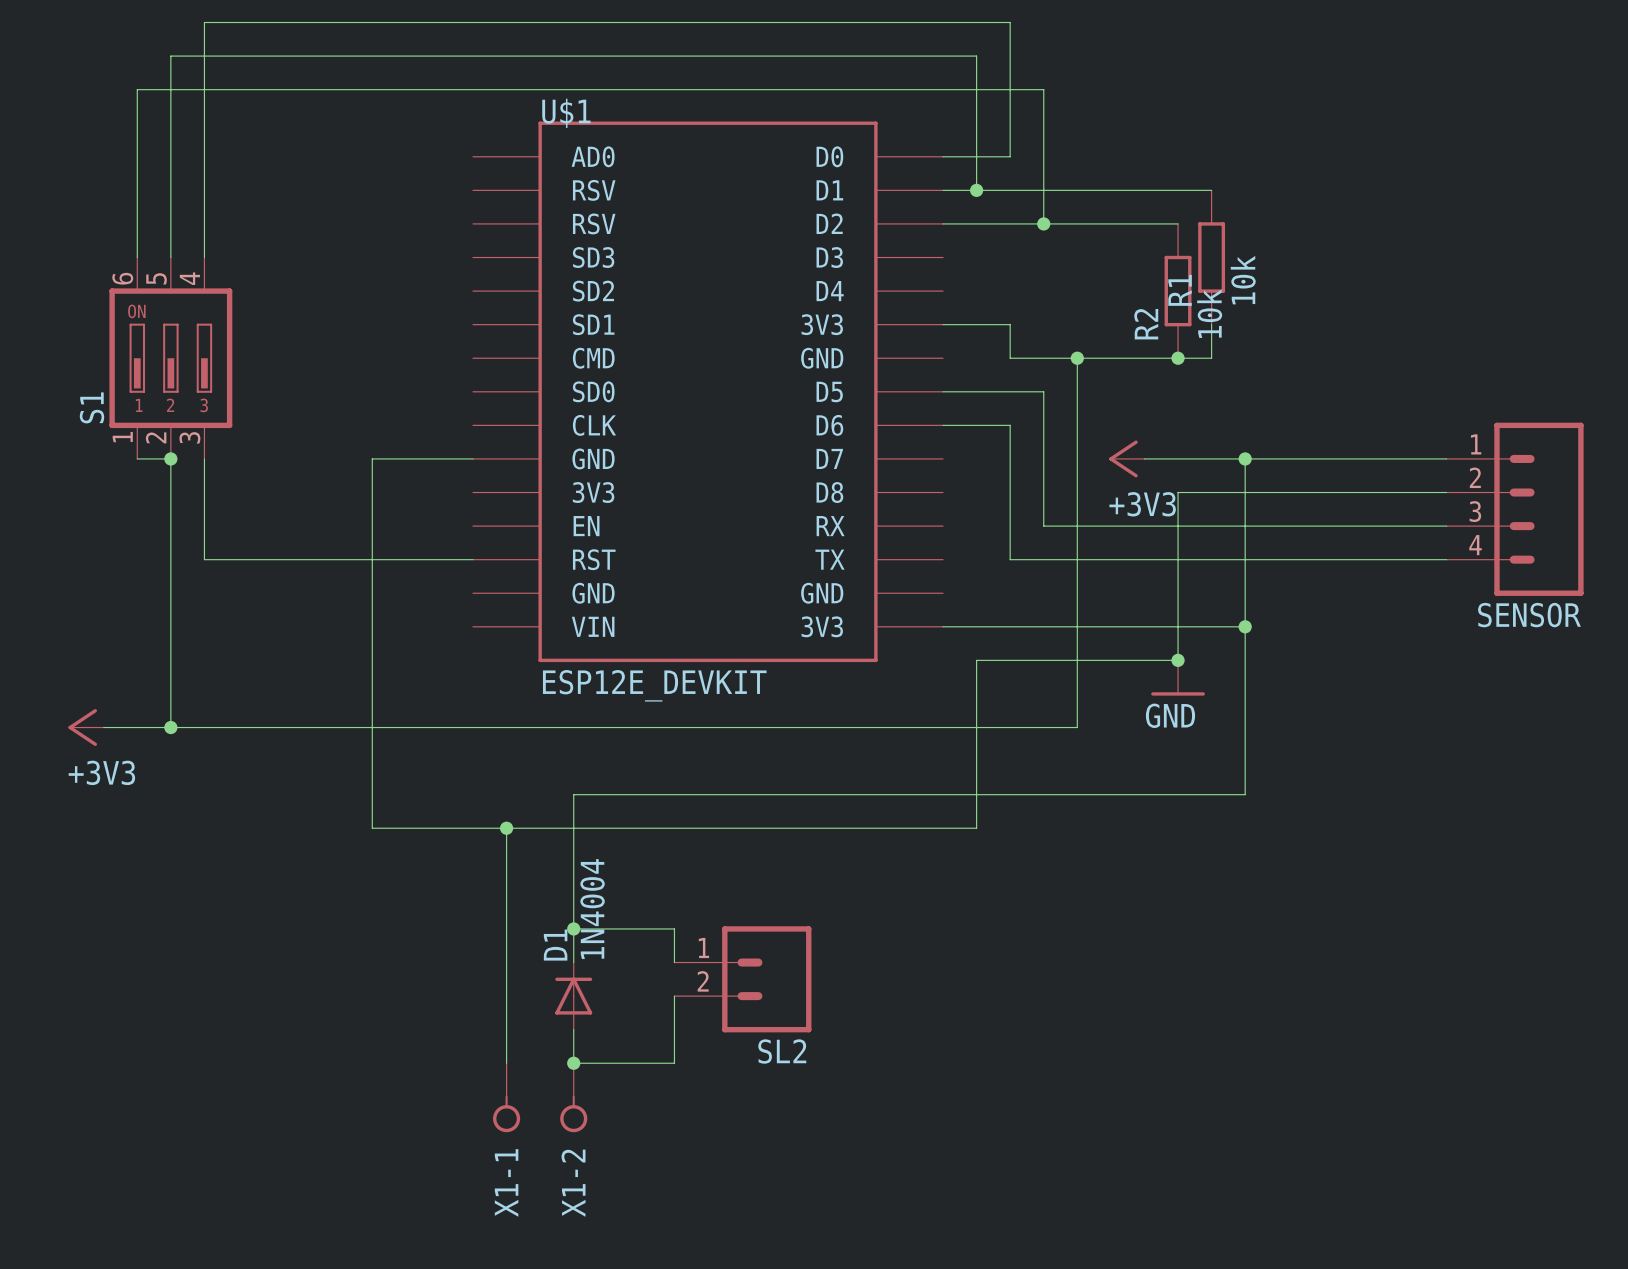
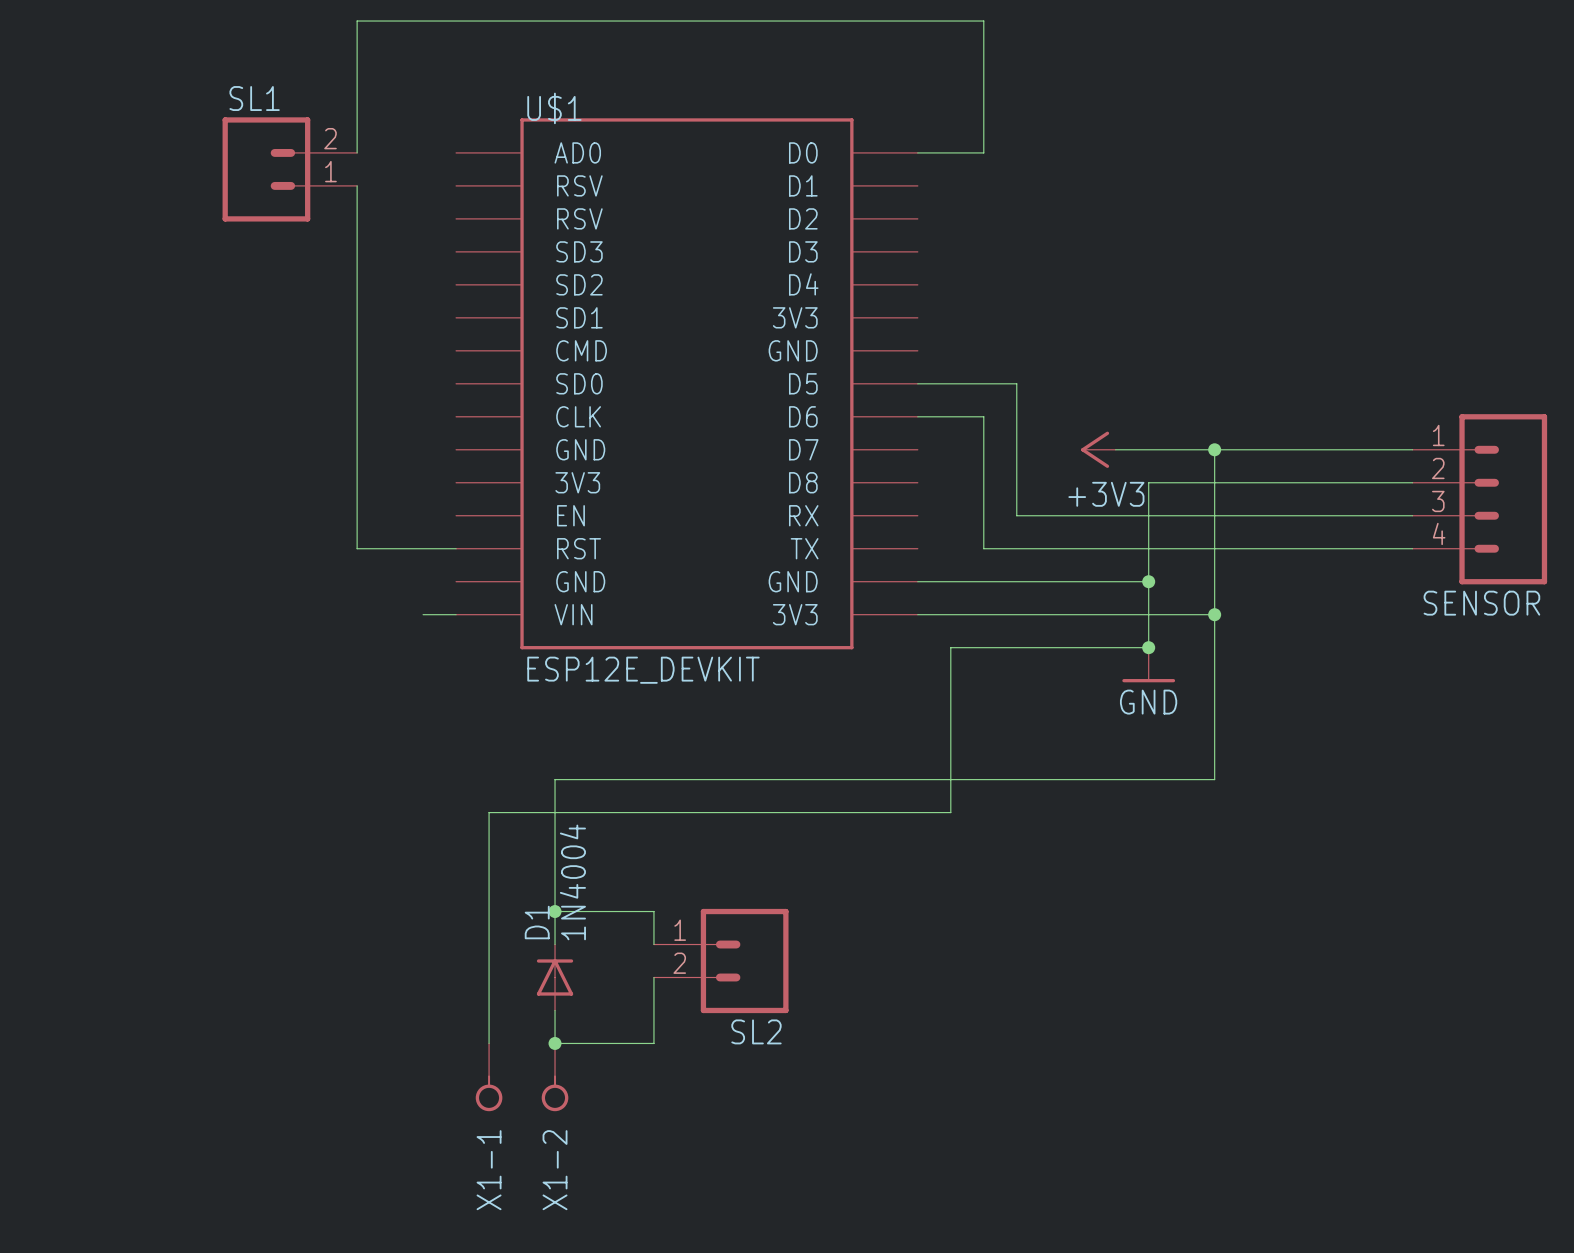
wire: (372, 22) (204, 22) (204, 257) -> (357, 21) (357, 152)
SL1: none -> (289, 169)
wire: (943, 190) (1211, 190) -> none
wire: (976, 190) (976, 56) (170, 56) (170, 257) -> none
junction: (976, 190) -> none
wire: (943, 223) (1178, 223) -> none
wire: (1043, 223) (1043, 89) (137, 89) (137, 257) -> none
junction: (1043, 223) -> none
R1: 10k (1211, 257) -> none
R2: 10k (1178, 291) -> none
wire: (943, 324) (1010, 324) (1010, 358) (1211, 358) (1211, 324) -> none
S1: (170, 358) -> none
wire: (1077, 358) (1077, 727) (103, 727) -> none
junction: (1077, 358) -> none
junction: (1178, 358) -> none
wire: (137, 458) (170, 458) (170, 727) -> none
junction: (170, 458) -> none
wire: (204, 458) (204, 559) (372, 559) (372, 828) (506, 828) -> none
wire: (372, 458) (473, 458) -> (357, 449) (357, 185)
wire: none -> (917, 581) (1148, 581)
junction: none -> (1148, 581)
wire: none -> (423, 614) (456, 614)
power symbol: +3V3 (86, 727) -> none
junction: (170, 727) -> none
junction: (506, 828) -> none

